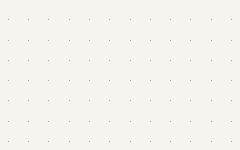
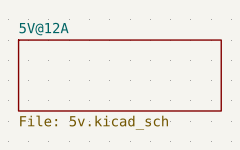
sheet 5V@12A: none -> File: 5v.kicad_sch (119, 75)

